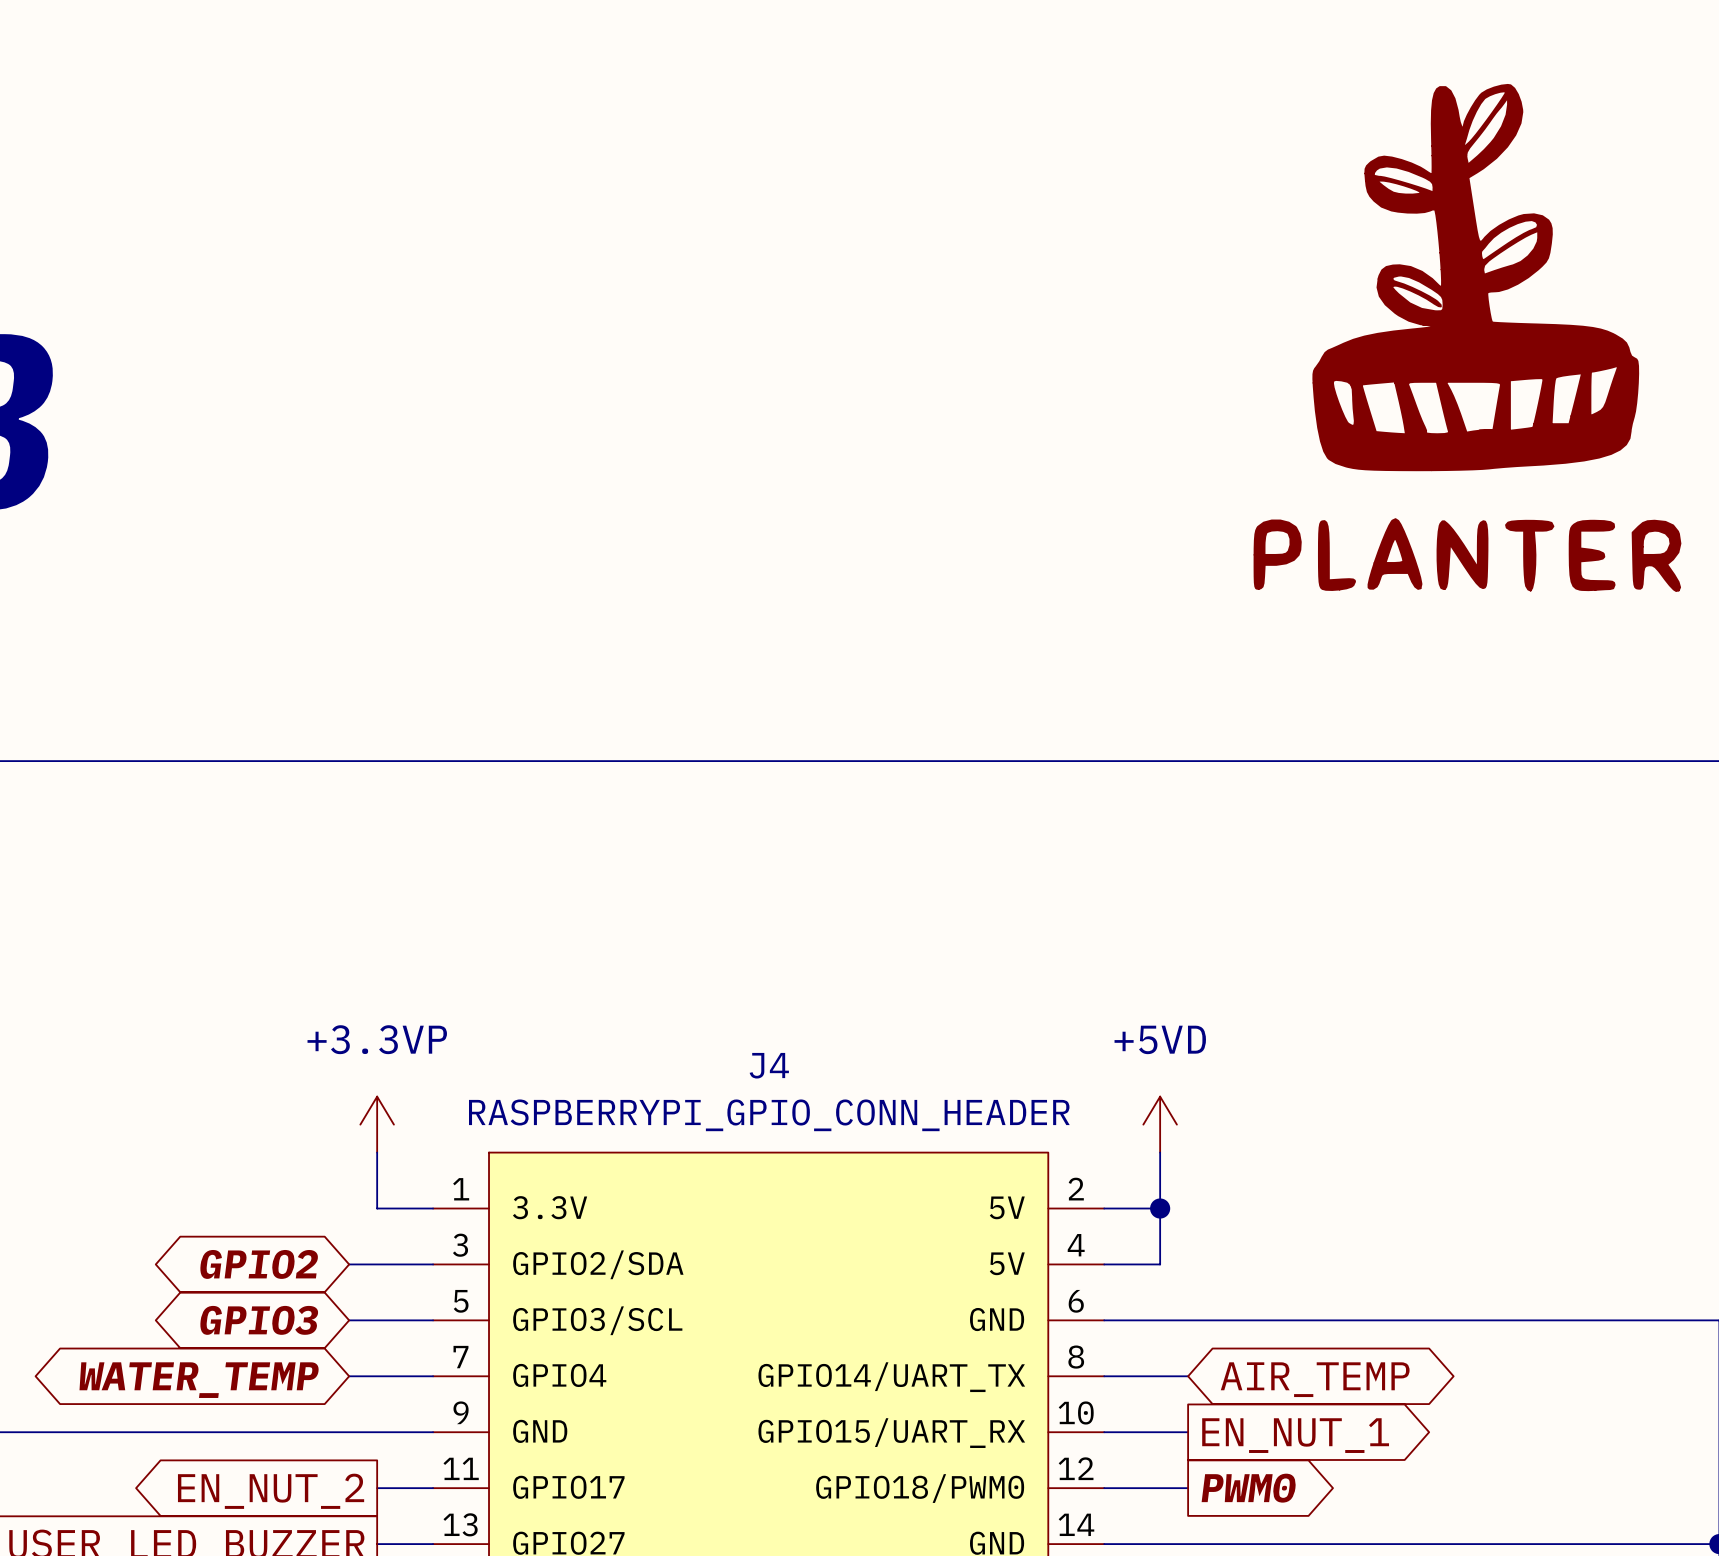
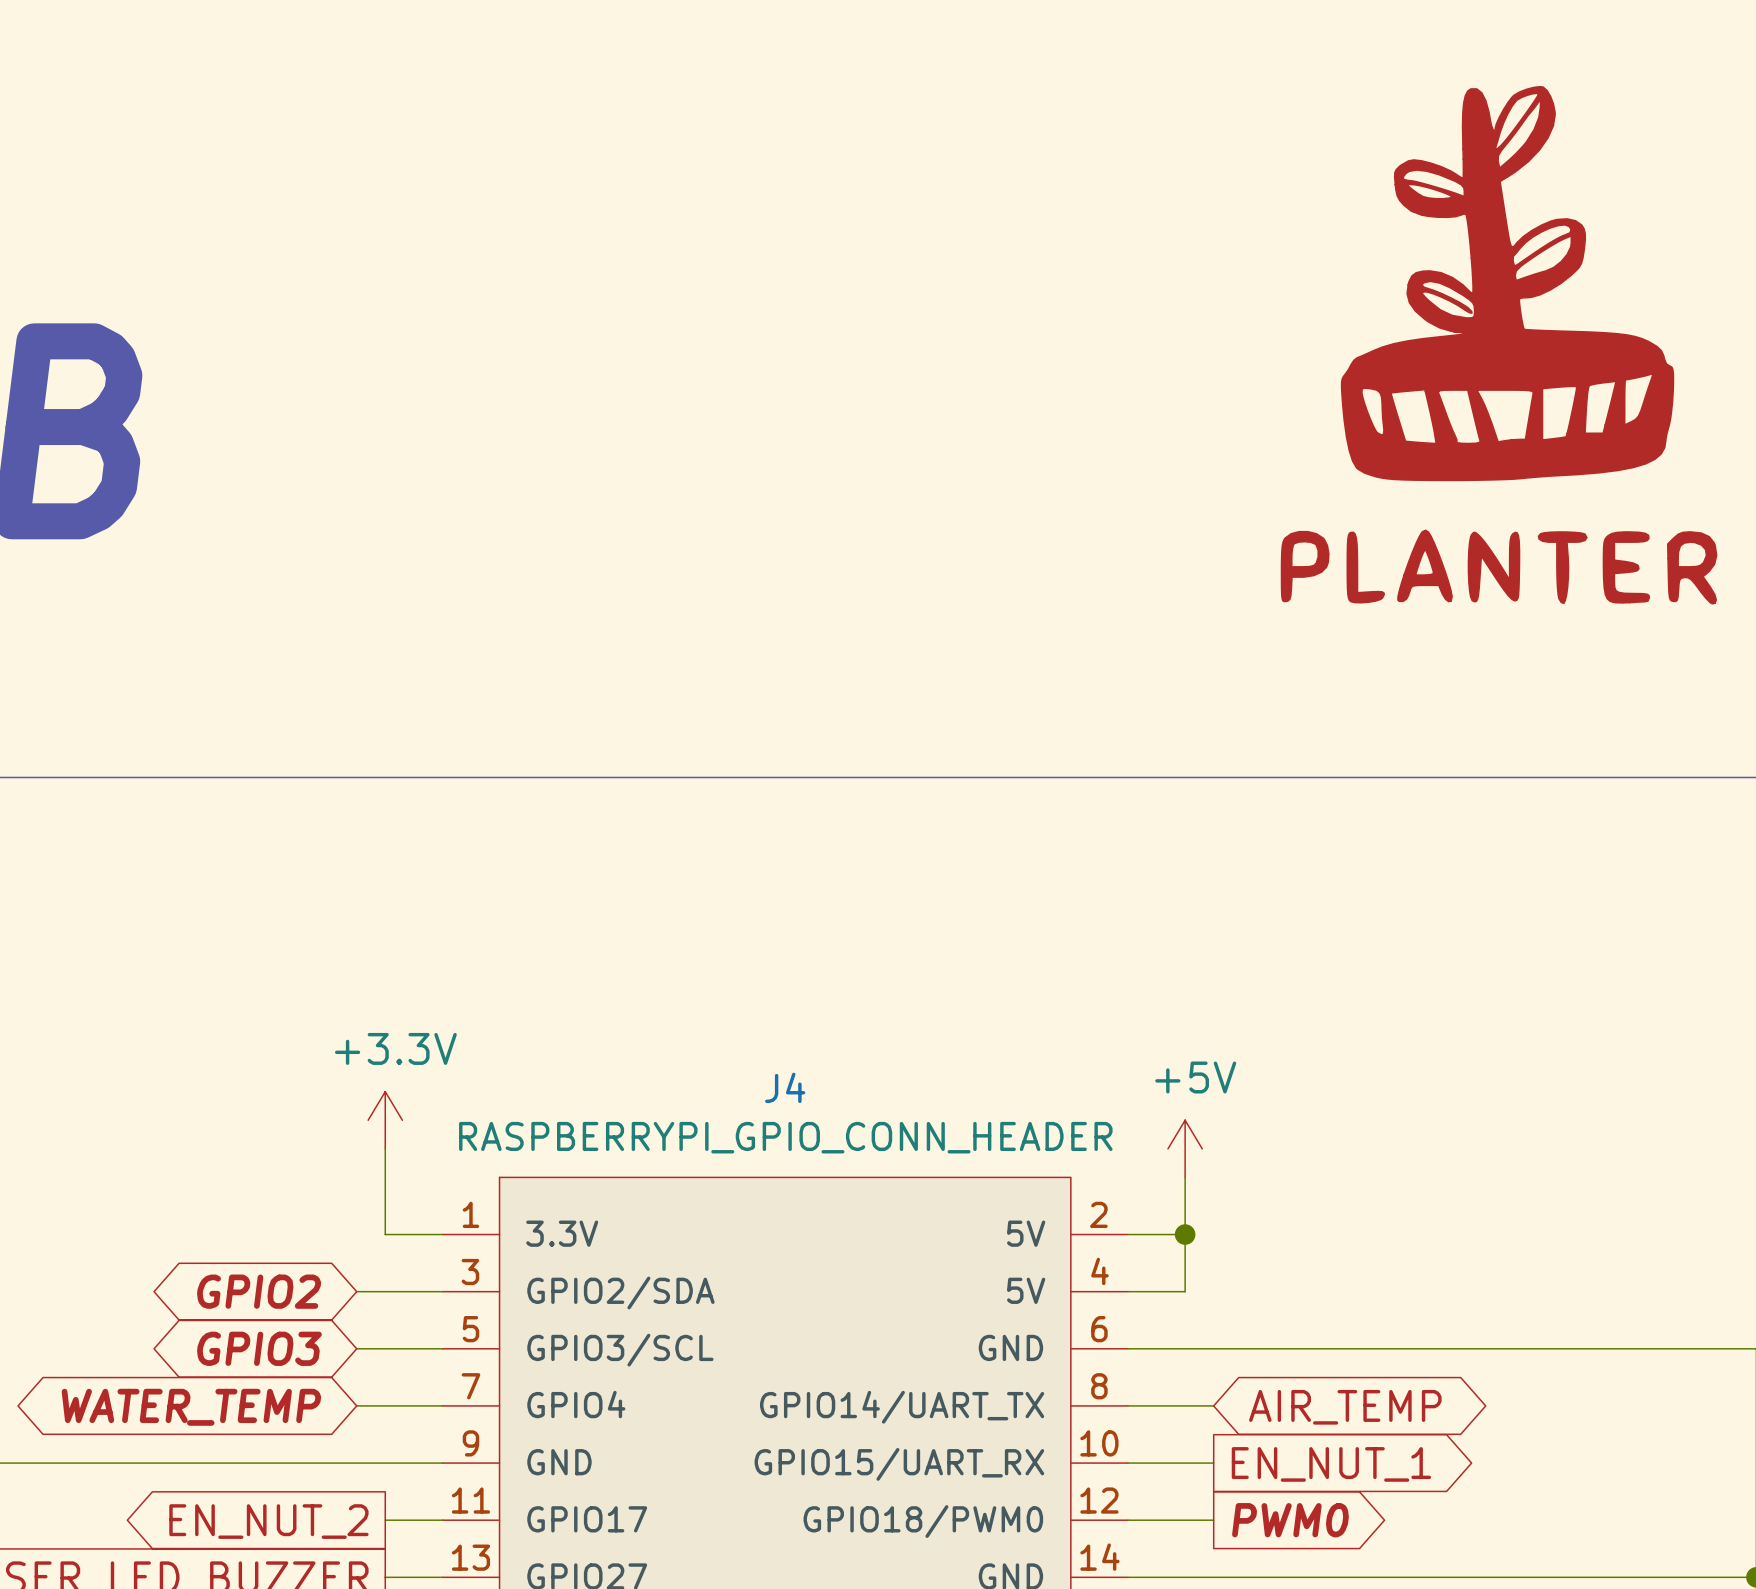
power symbol: none -> +3.3V (385, 1120)
power symbol: +3.3VP (377, 1124) -> none
power symbol: +5VD (1160, 1124) -> +5V (1185, 1148)

